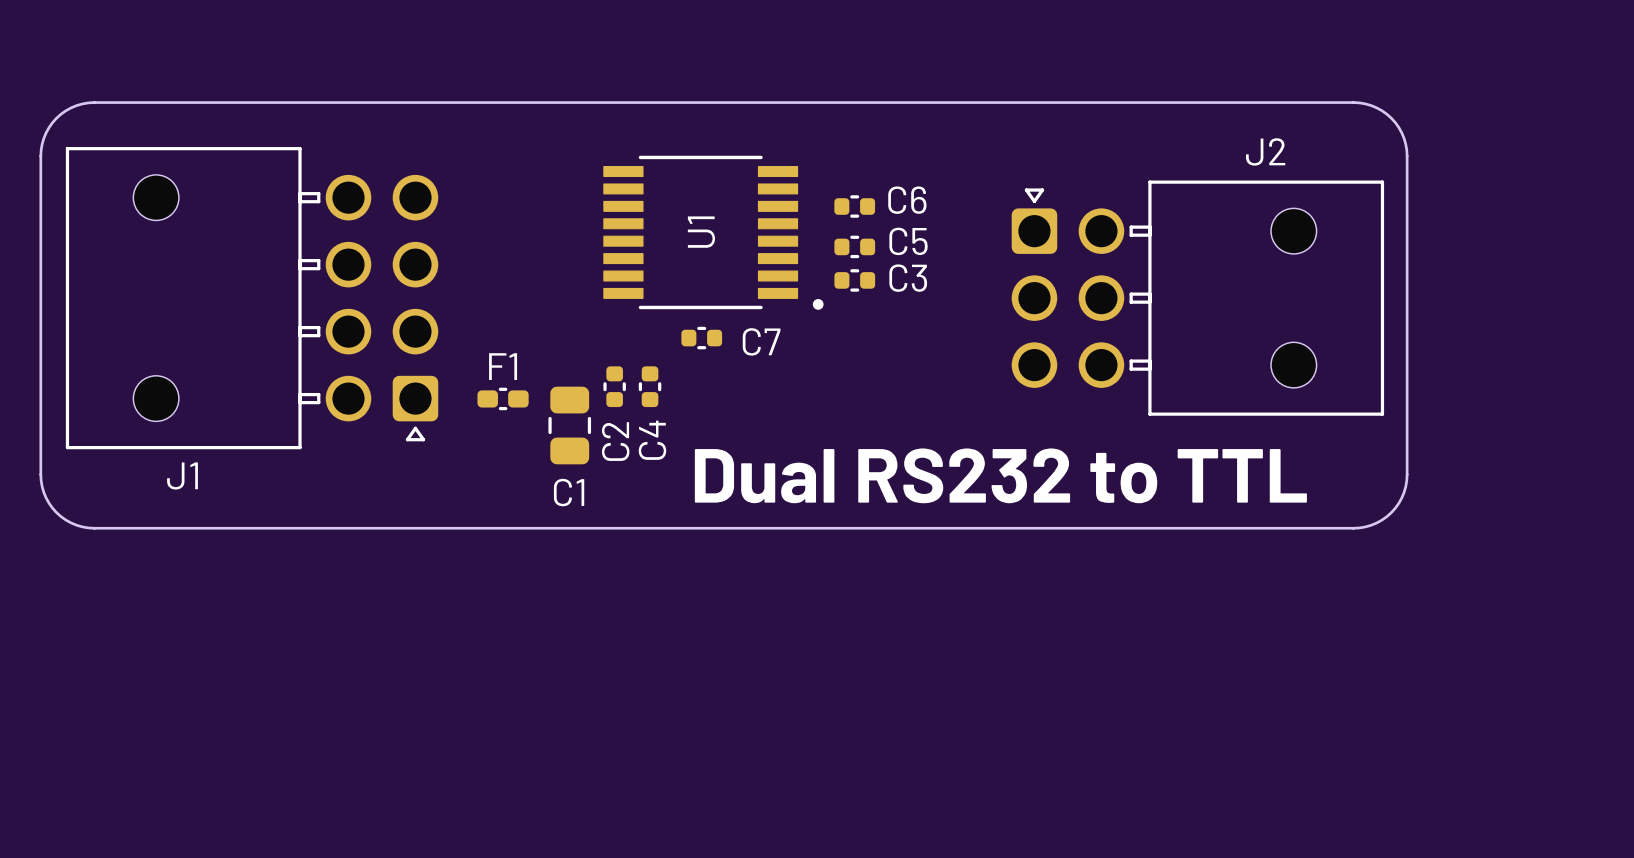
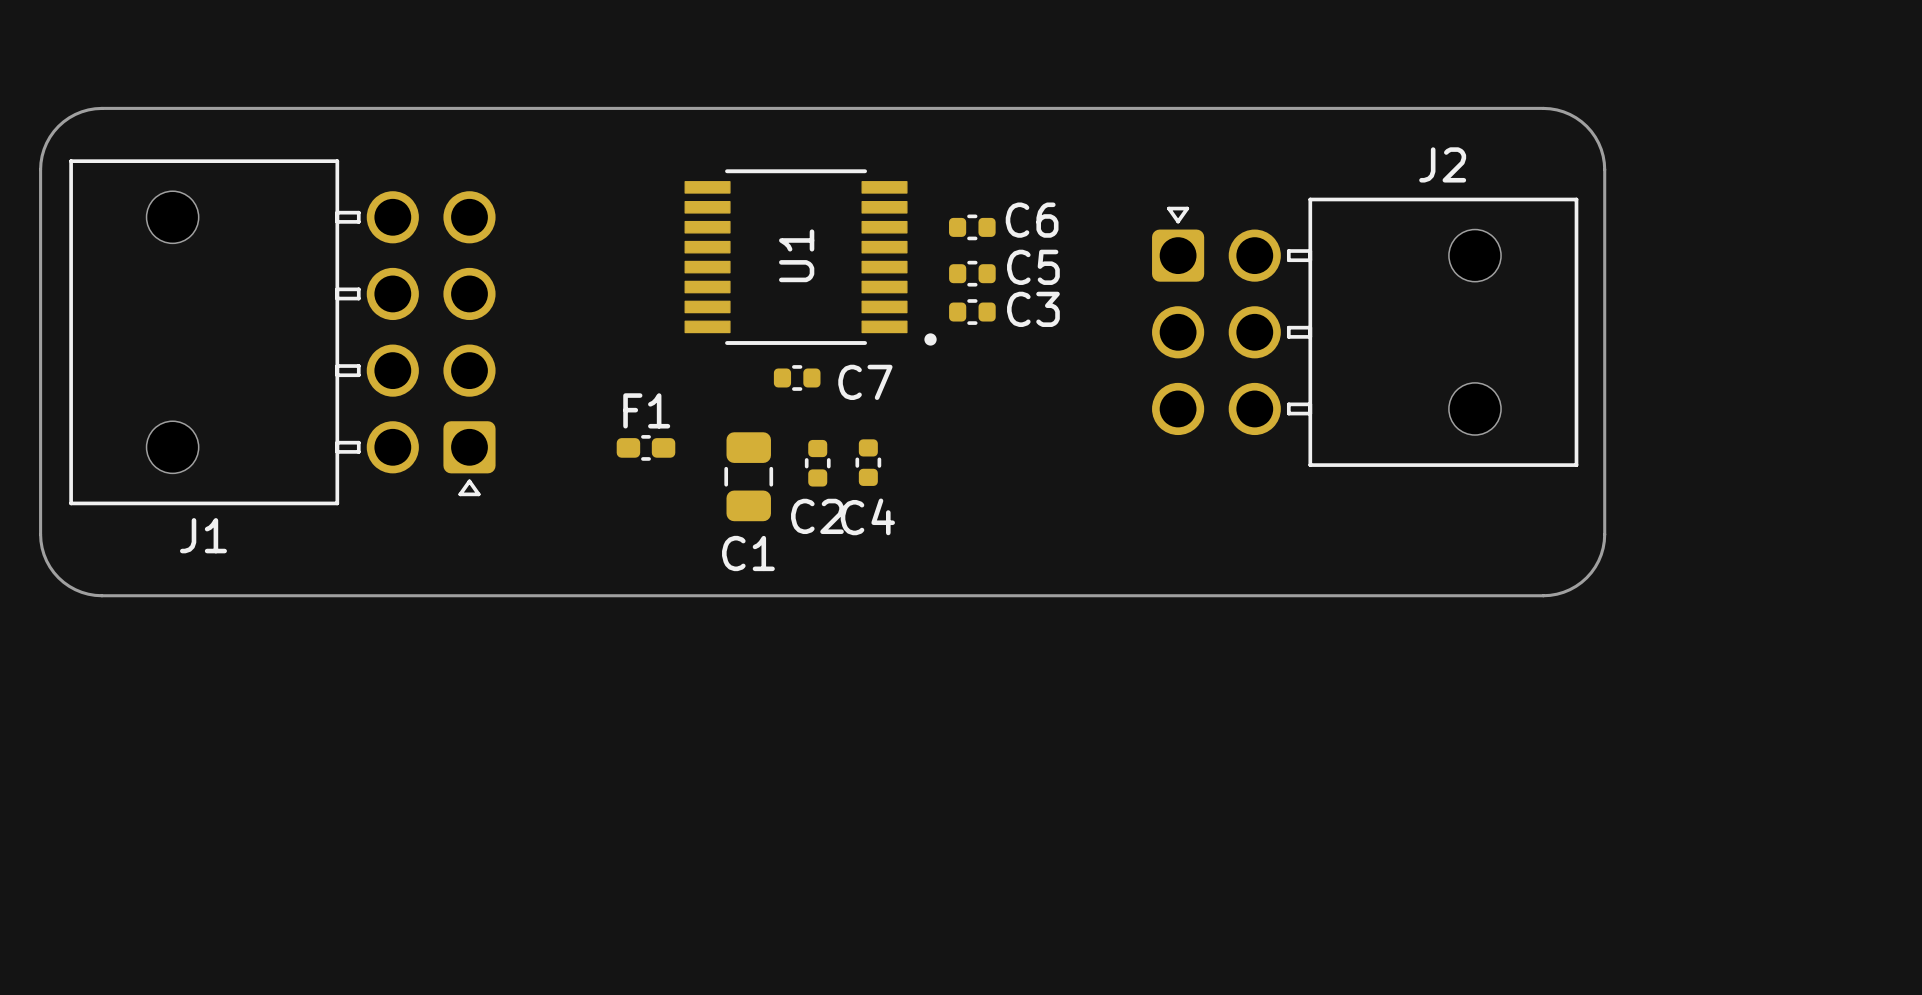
C2 position: (614, 386) -> (817, 463)
C4 position: (650, 386) -> (868, 462)
F1 position: (503, 398) -> (645, 447)
C1 position: (569, 425) -> (748, 476)
C4 name rotation: 0° (652, 440) -> 90° clockwise (867, 516)
C2 name rotation: 0° (615, 441) -> 90° clockwise (817, 516)
text: Dual RS232 to TTL (1000, 475) -> none

